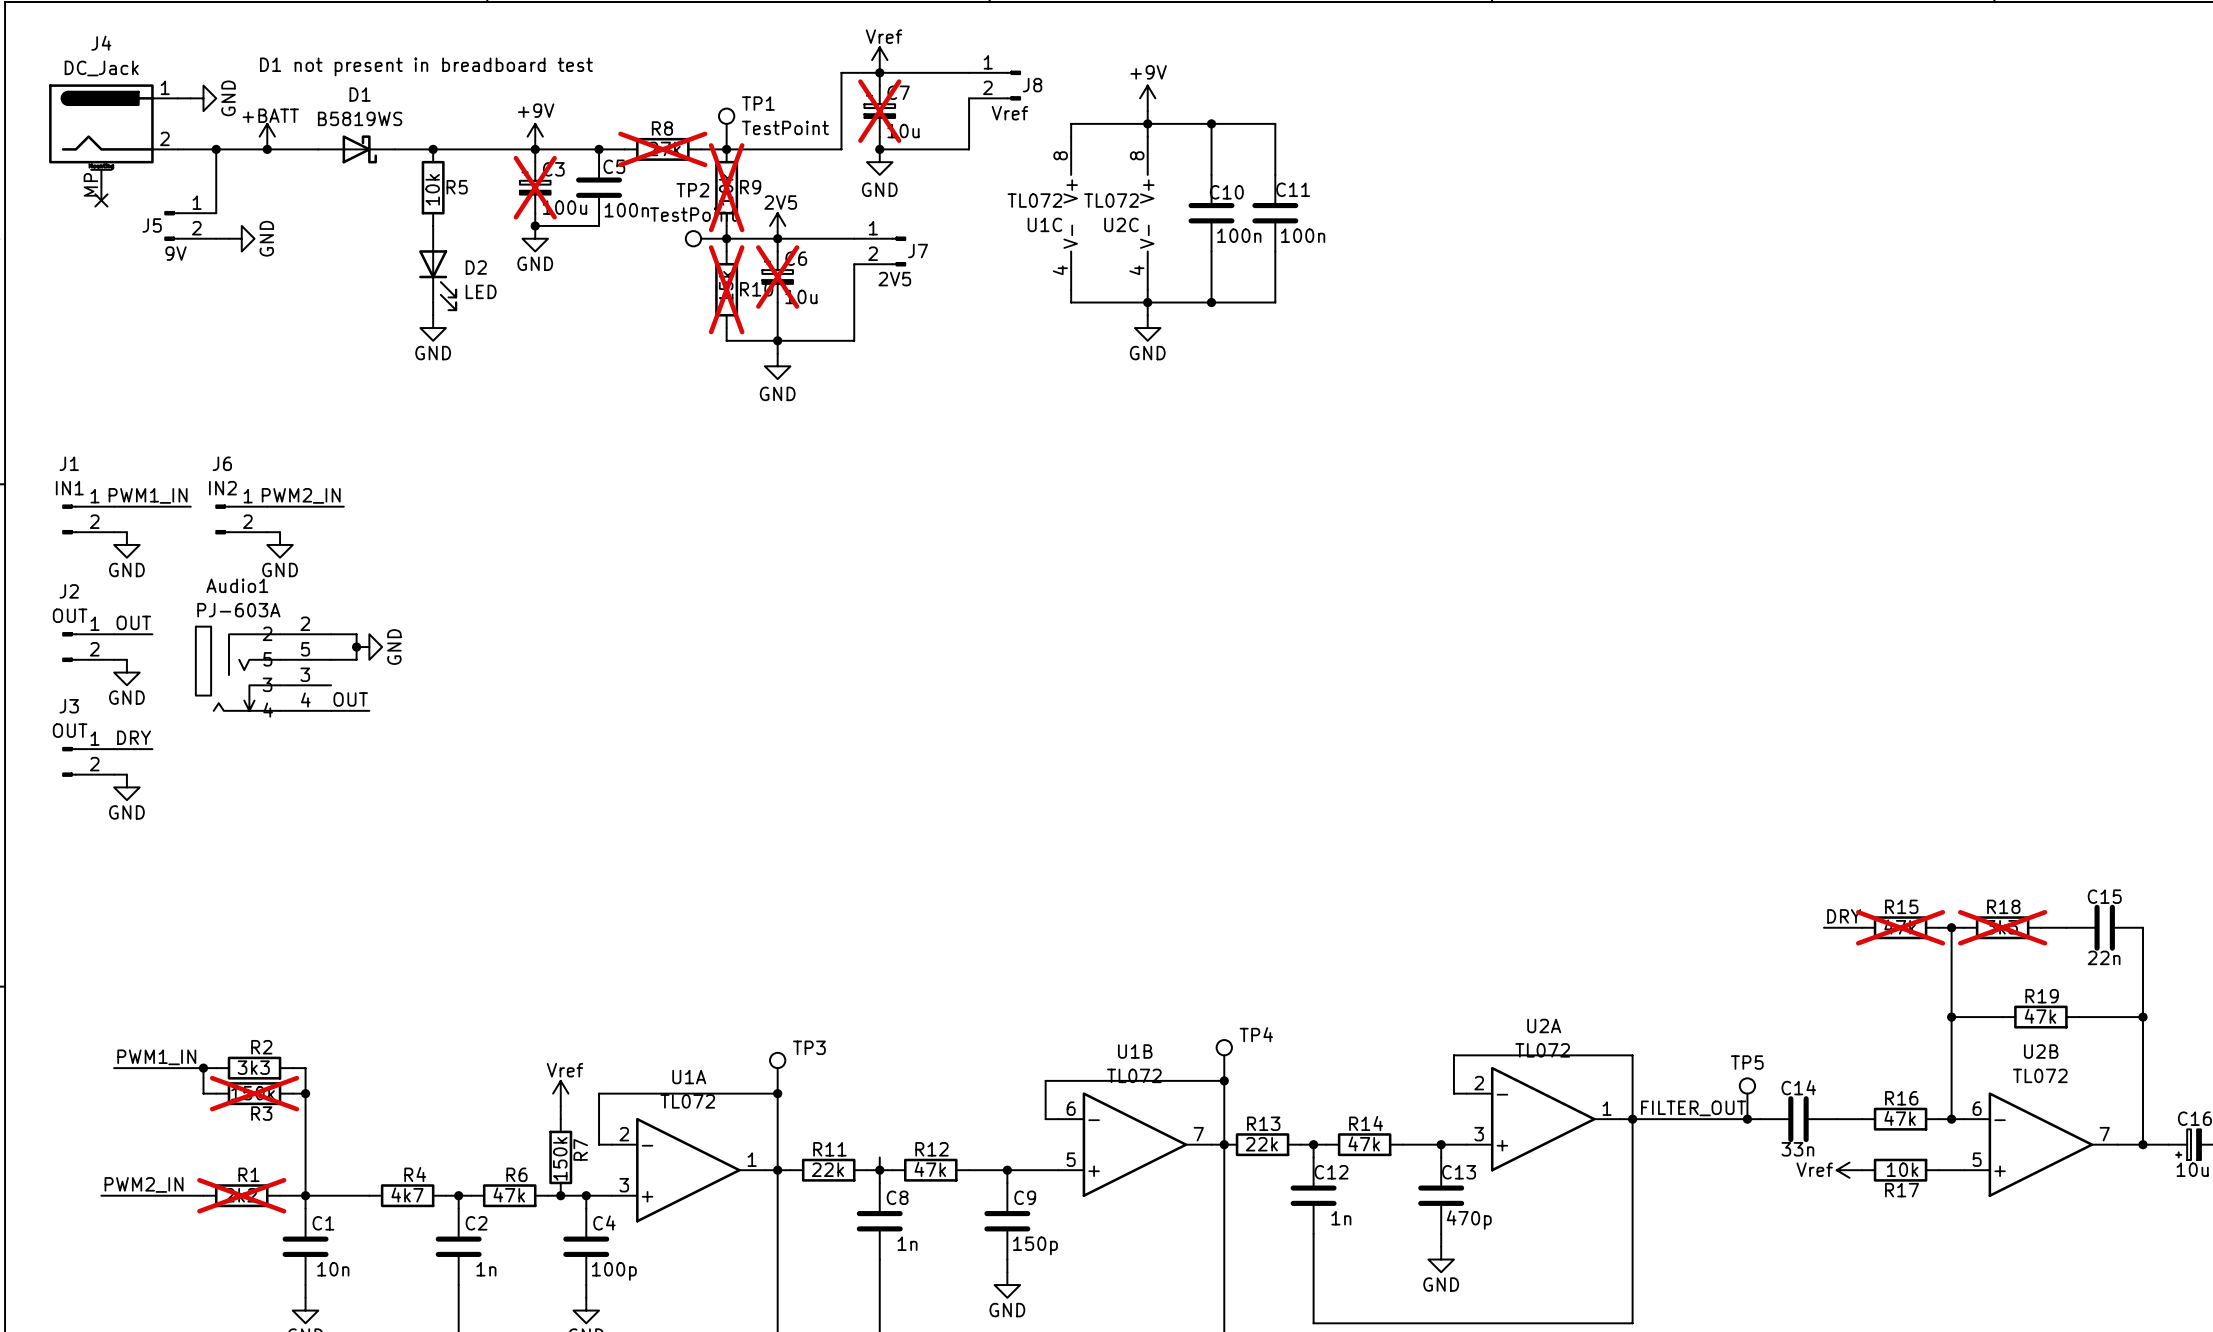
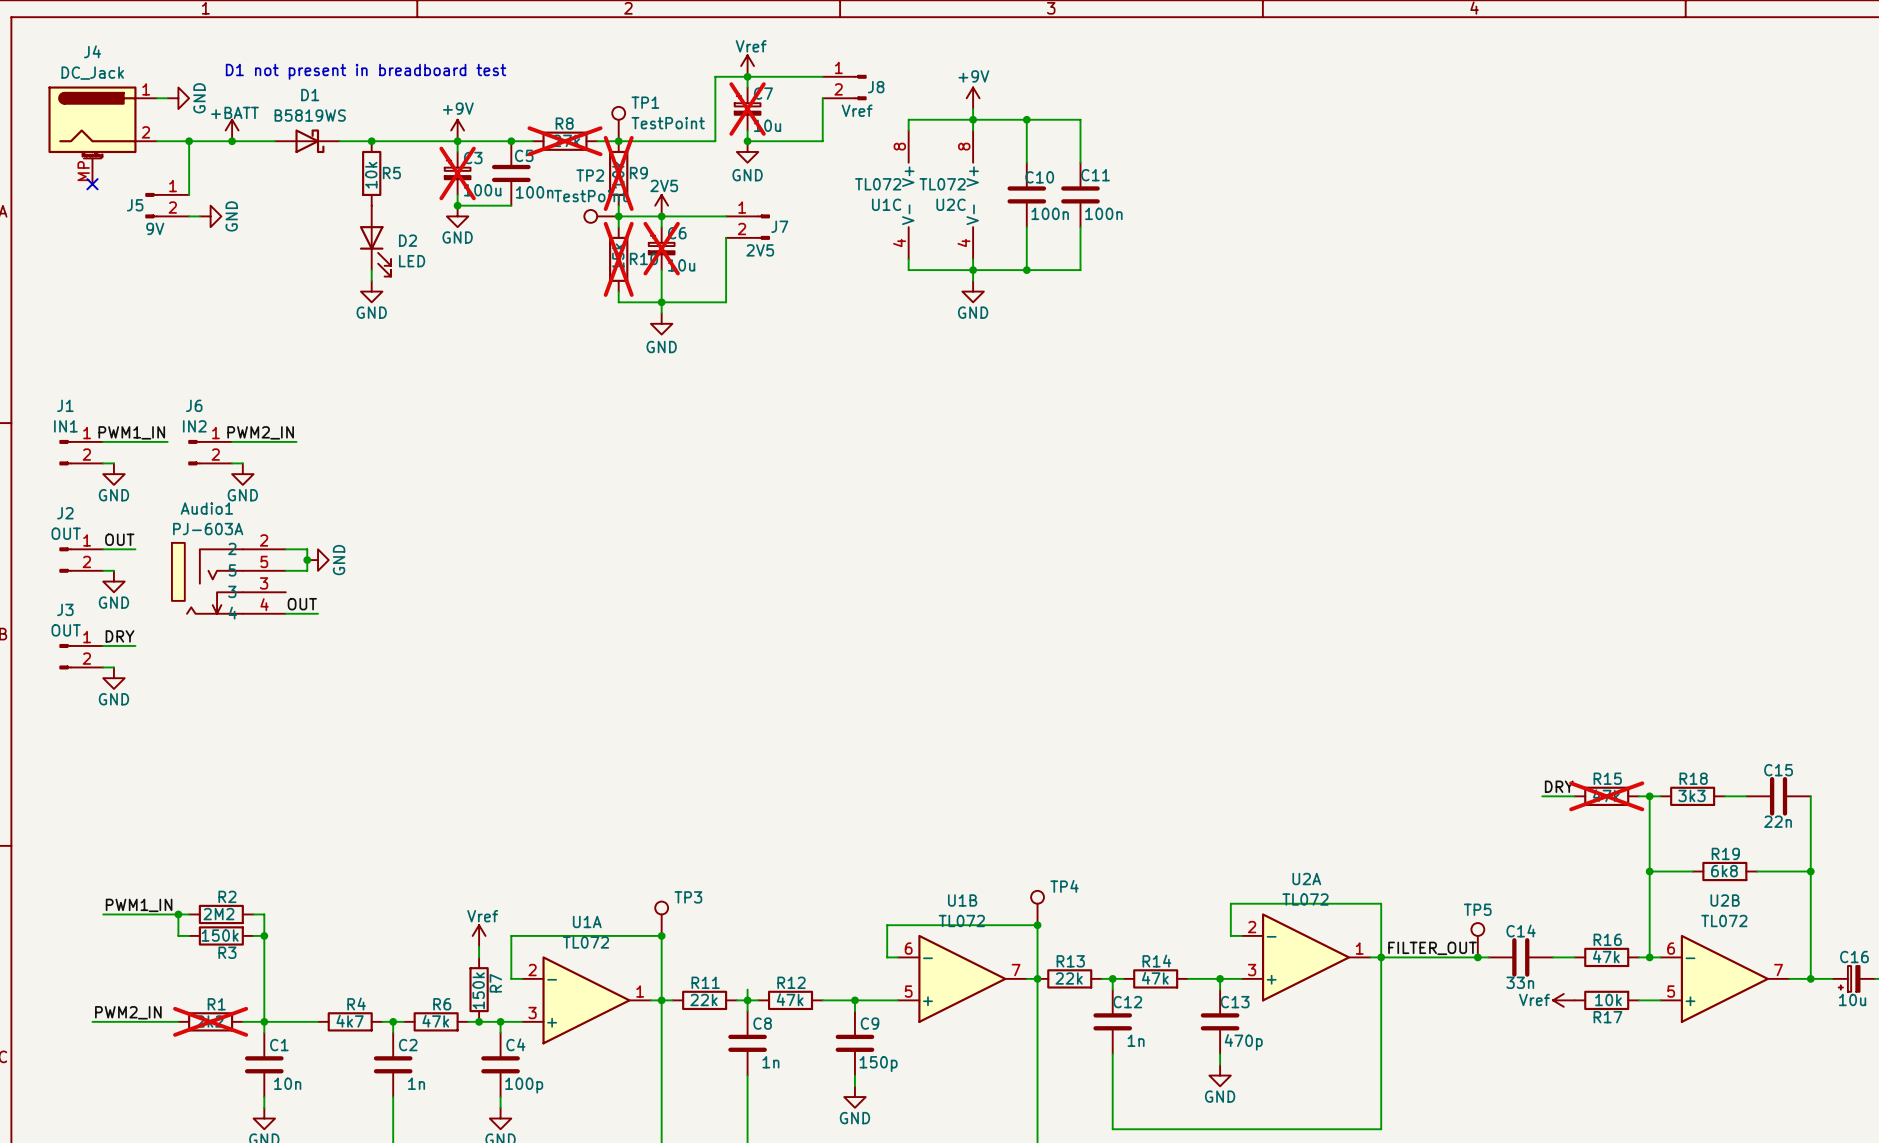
R18 do-not-place cross: (2002, 927) -> none
R19 value: 47k (2040, 1016) -> 6k8 (1724, 871)
R2 value: 3k3 (253, 1067) -> 2M2 (218, 914)
R3 do-not-place cross: (254, 1093) -> none

